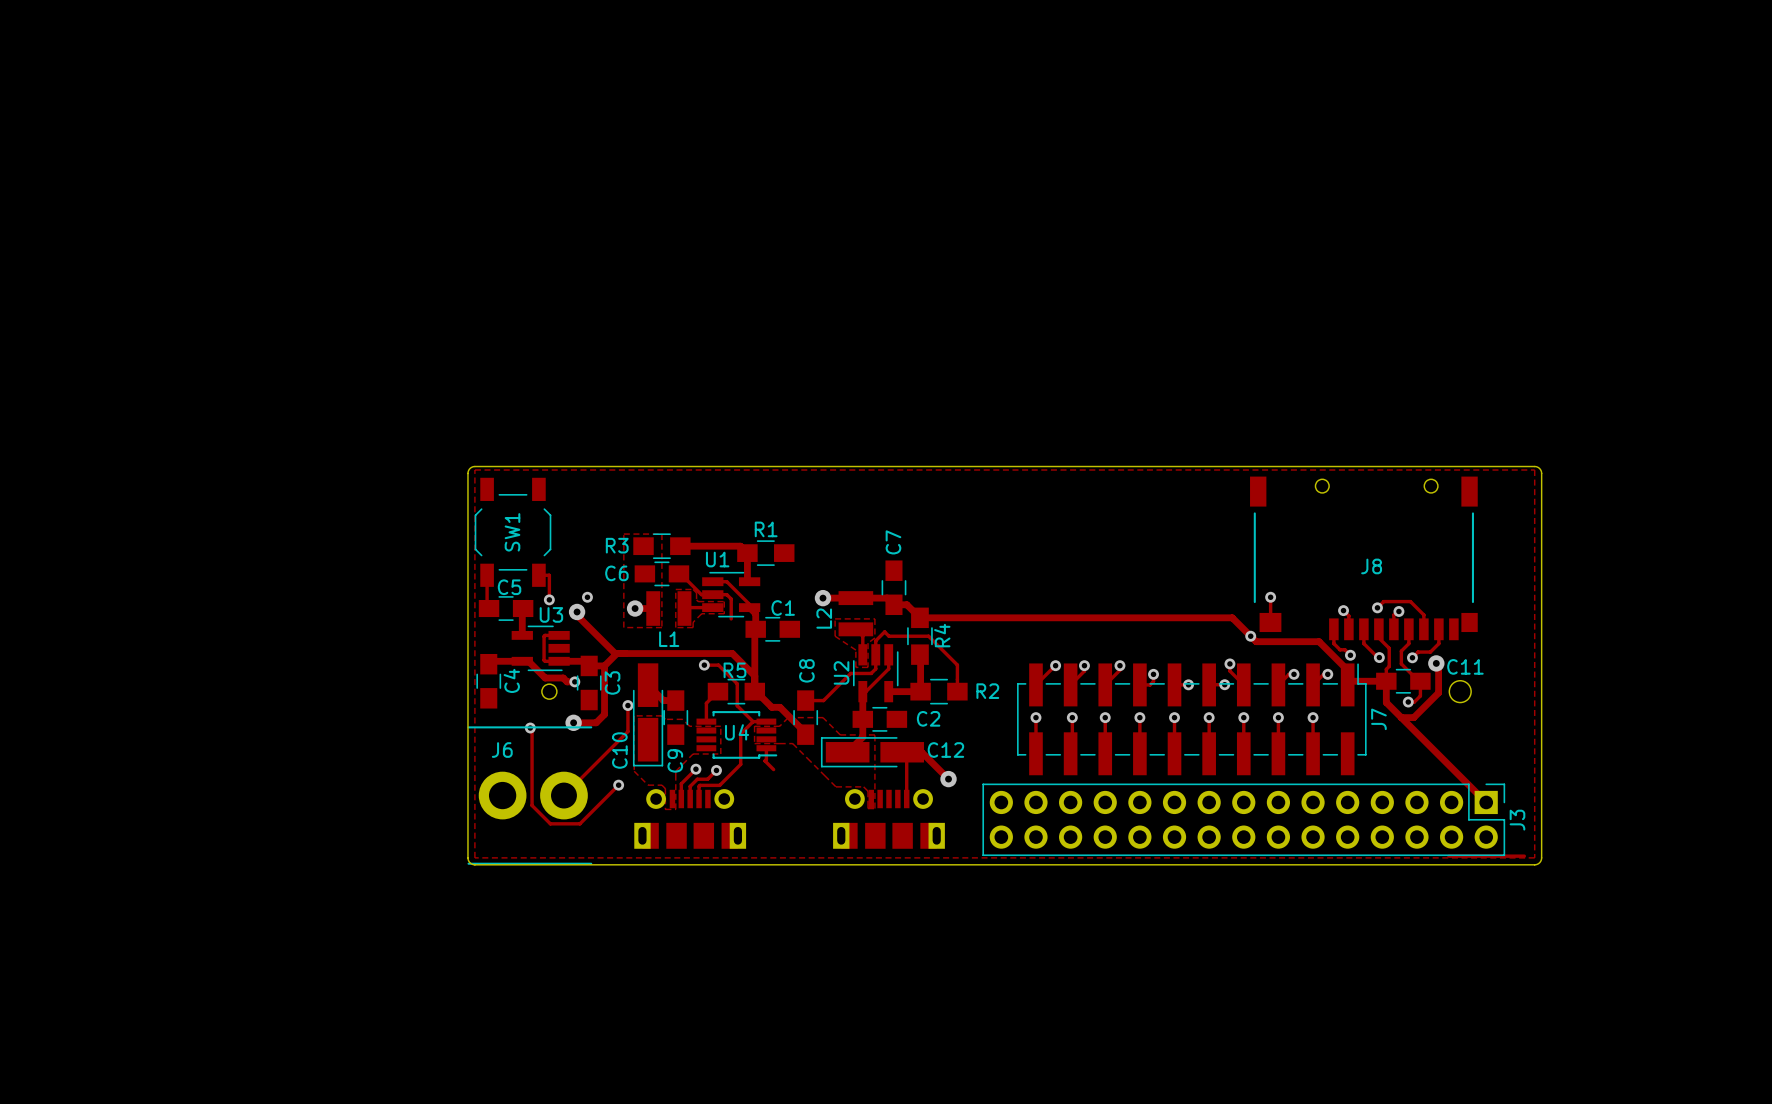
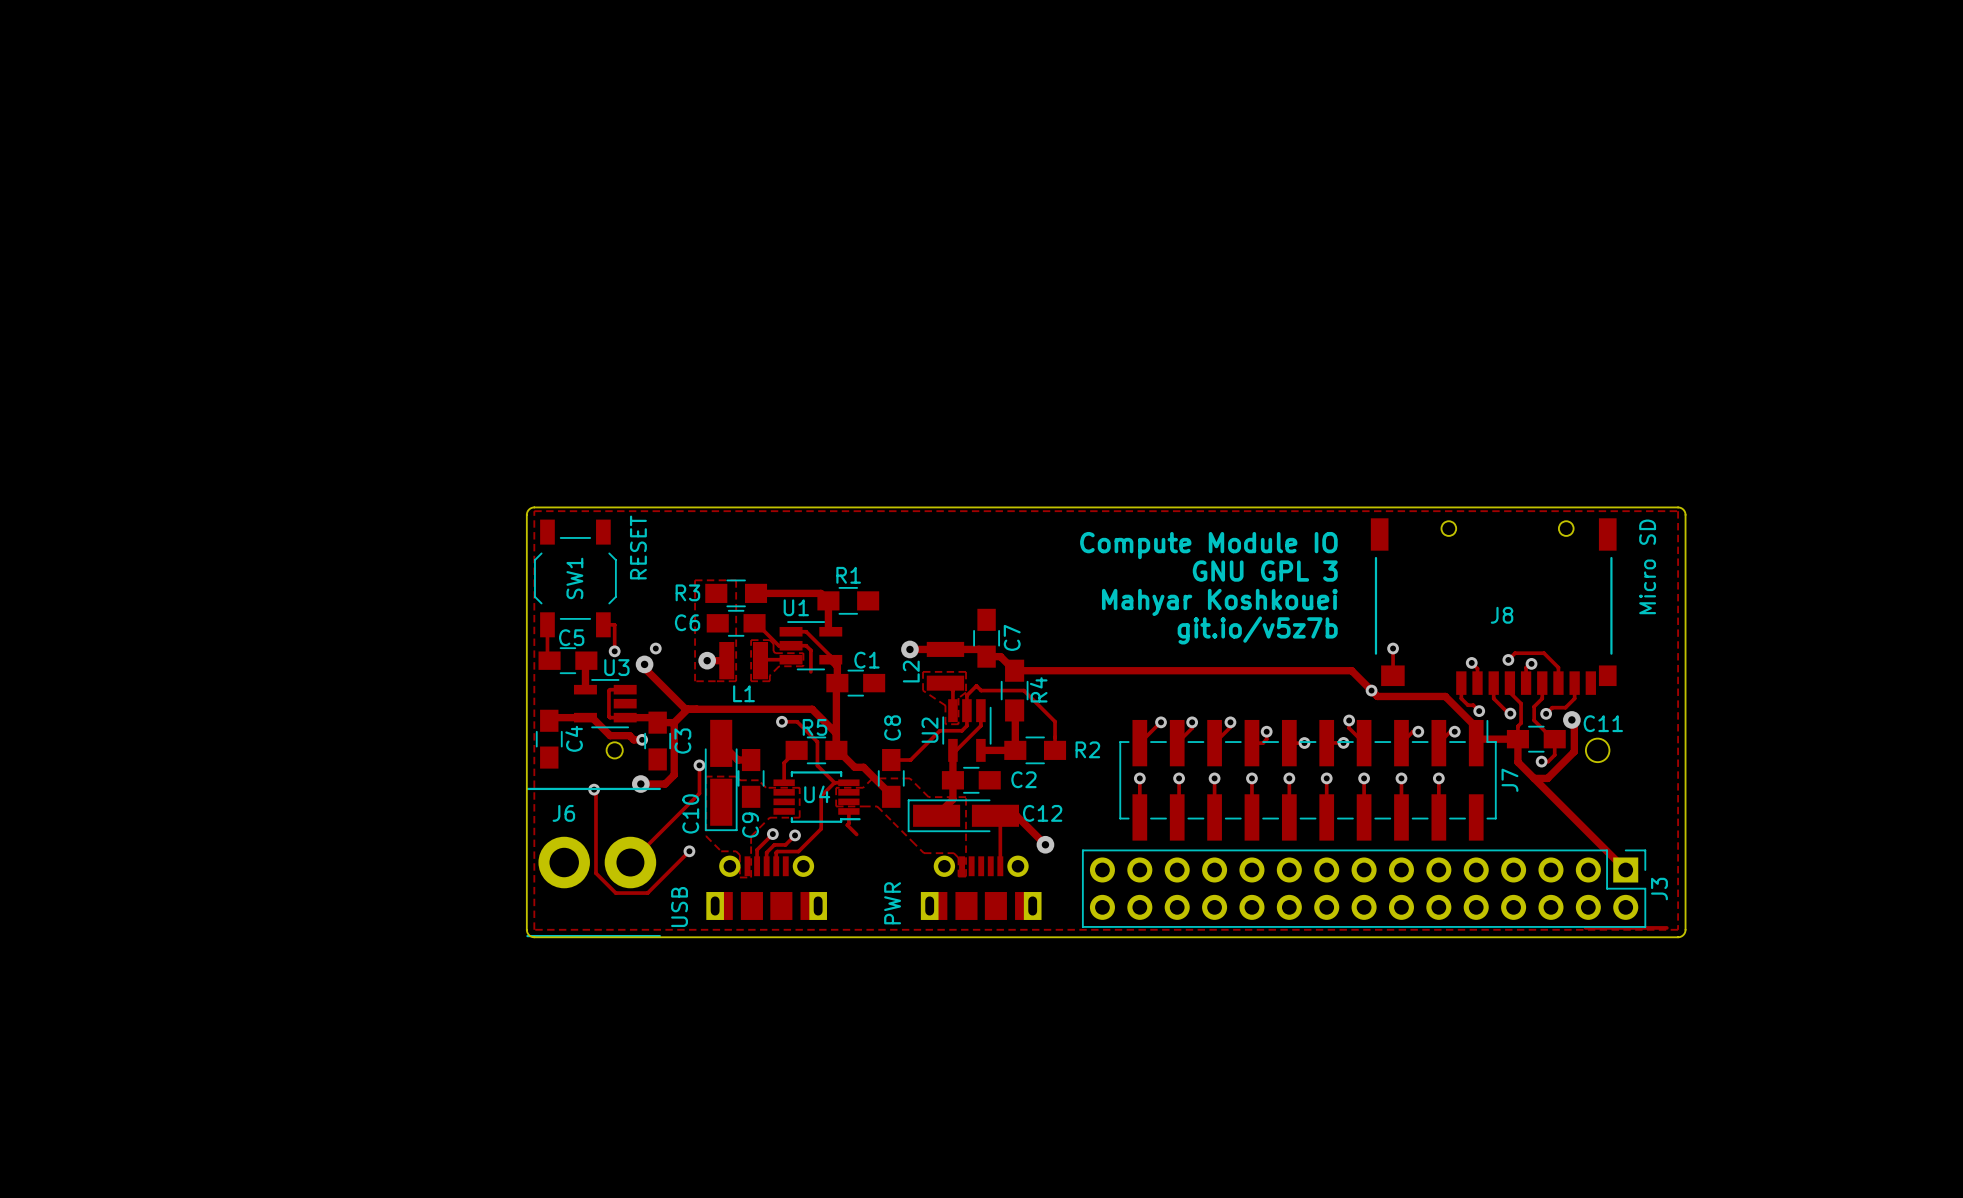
text: none -> Compute Module IO (1208, 545)
text: none -> RESET (638, 547)
text: none -> Micro SD (1647, 566)
text: none -> GNU GPL 3 (1265, 571)
C7 name position: C7 (893, 542) -> C7 (1012, 637)
text: none -> Mahyar Koshkouei (1219, 602)
text: none -> git.io/v5z7b (1257, 630)
text: none -> PWR (892, 903)
text: none -> USB (679, 907)

